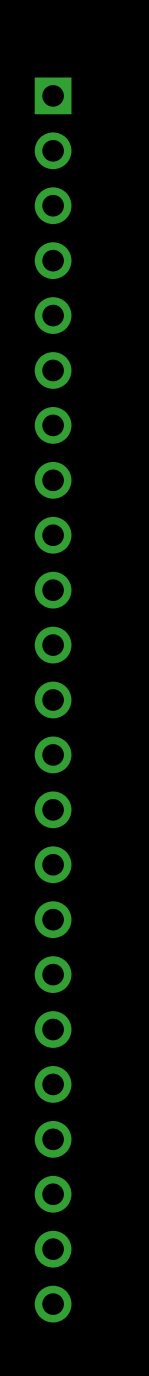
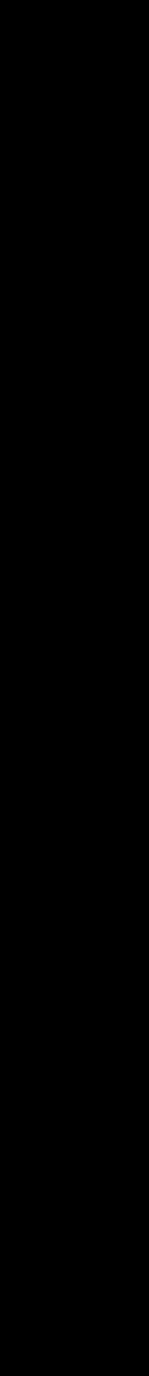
part: (53, 699) -> none

